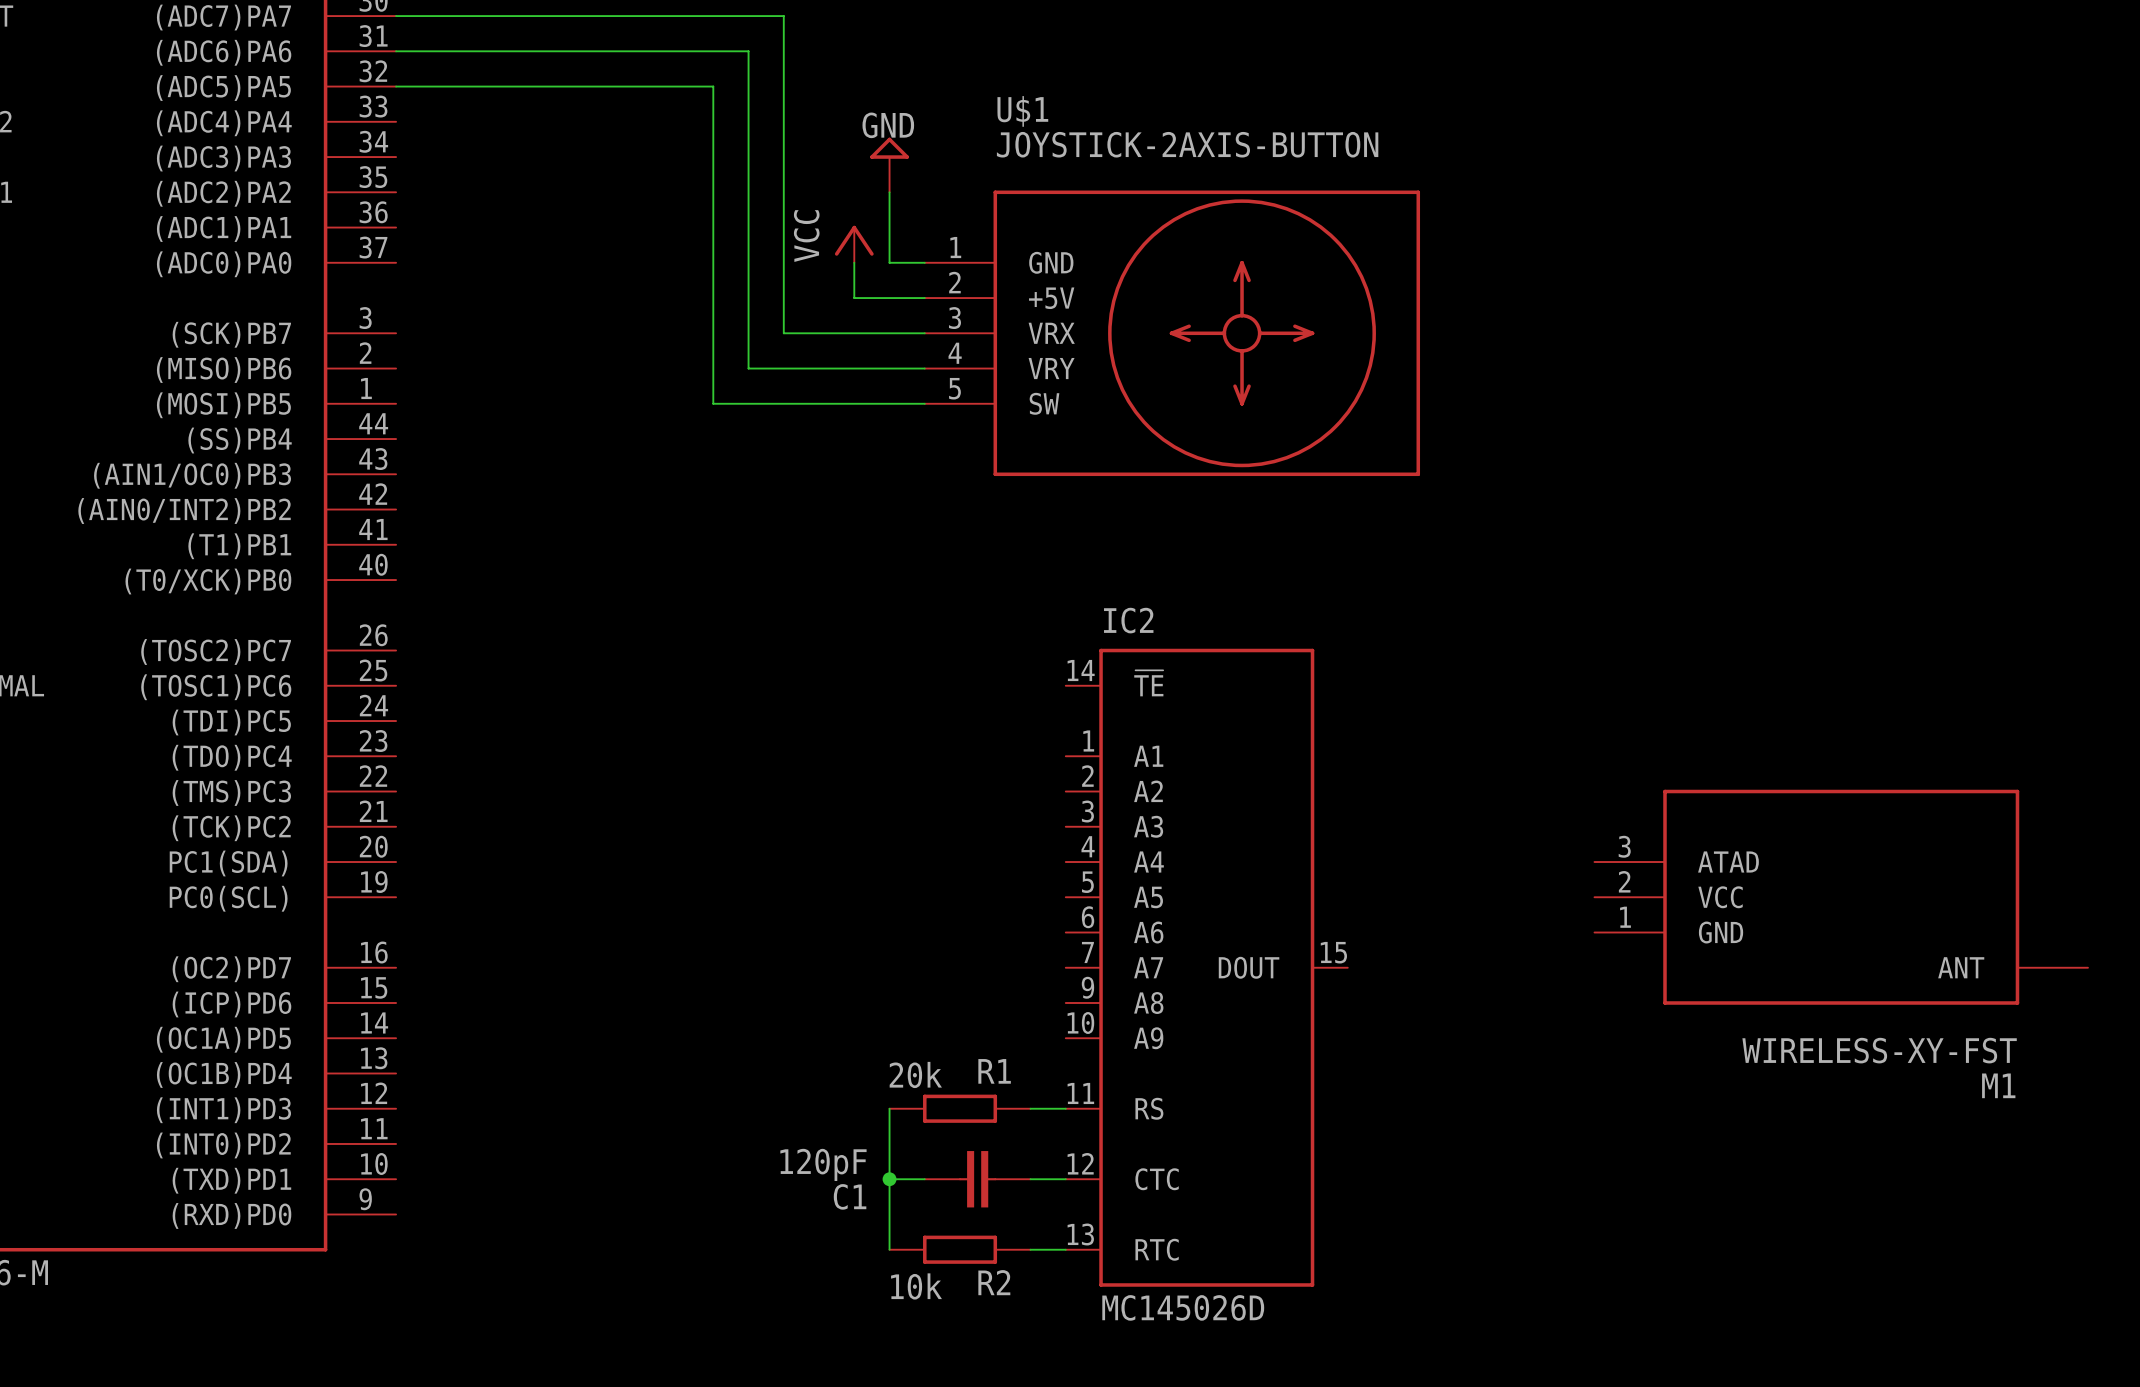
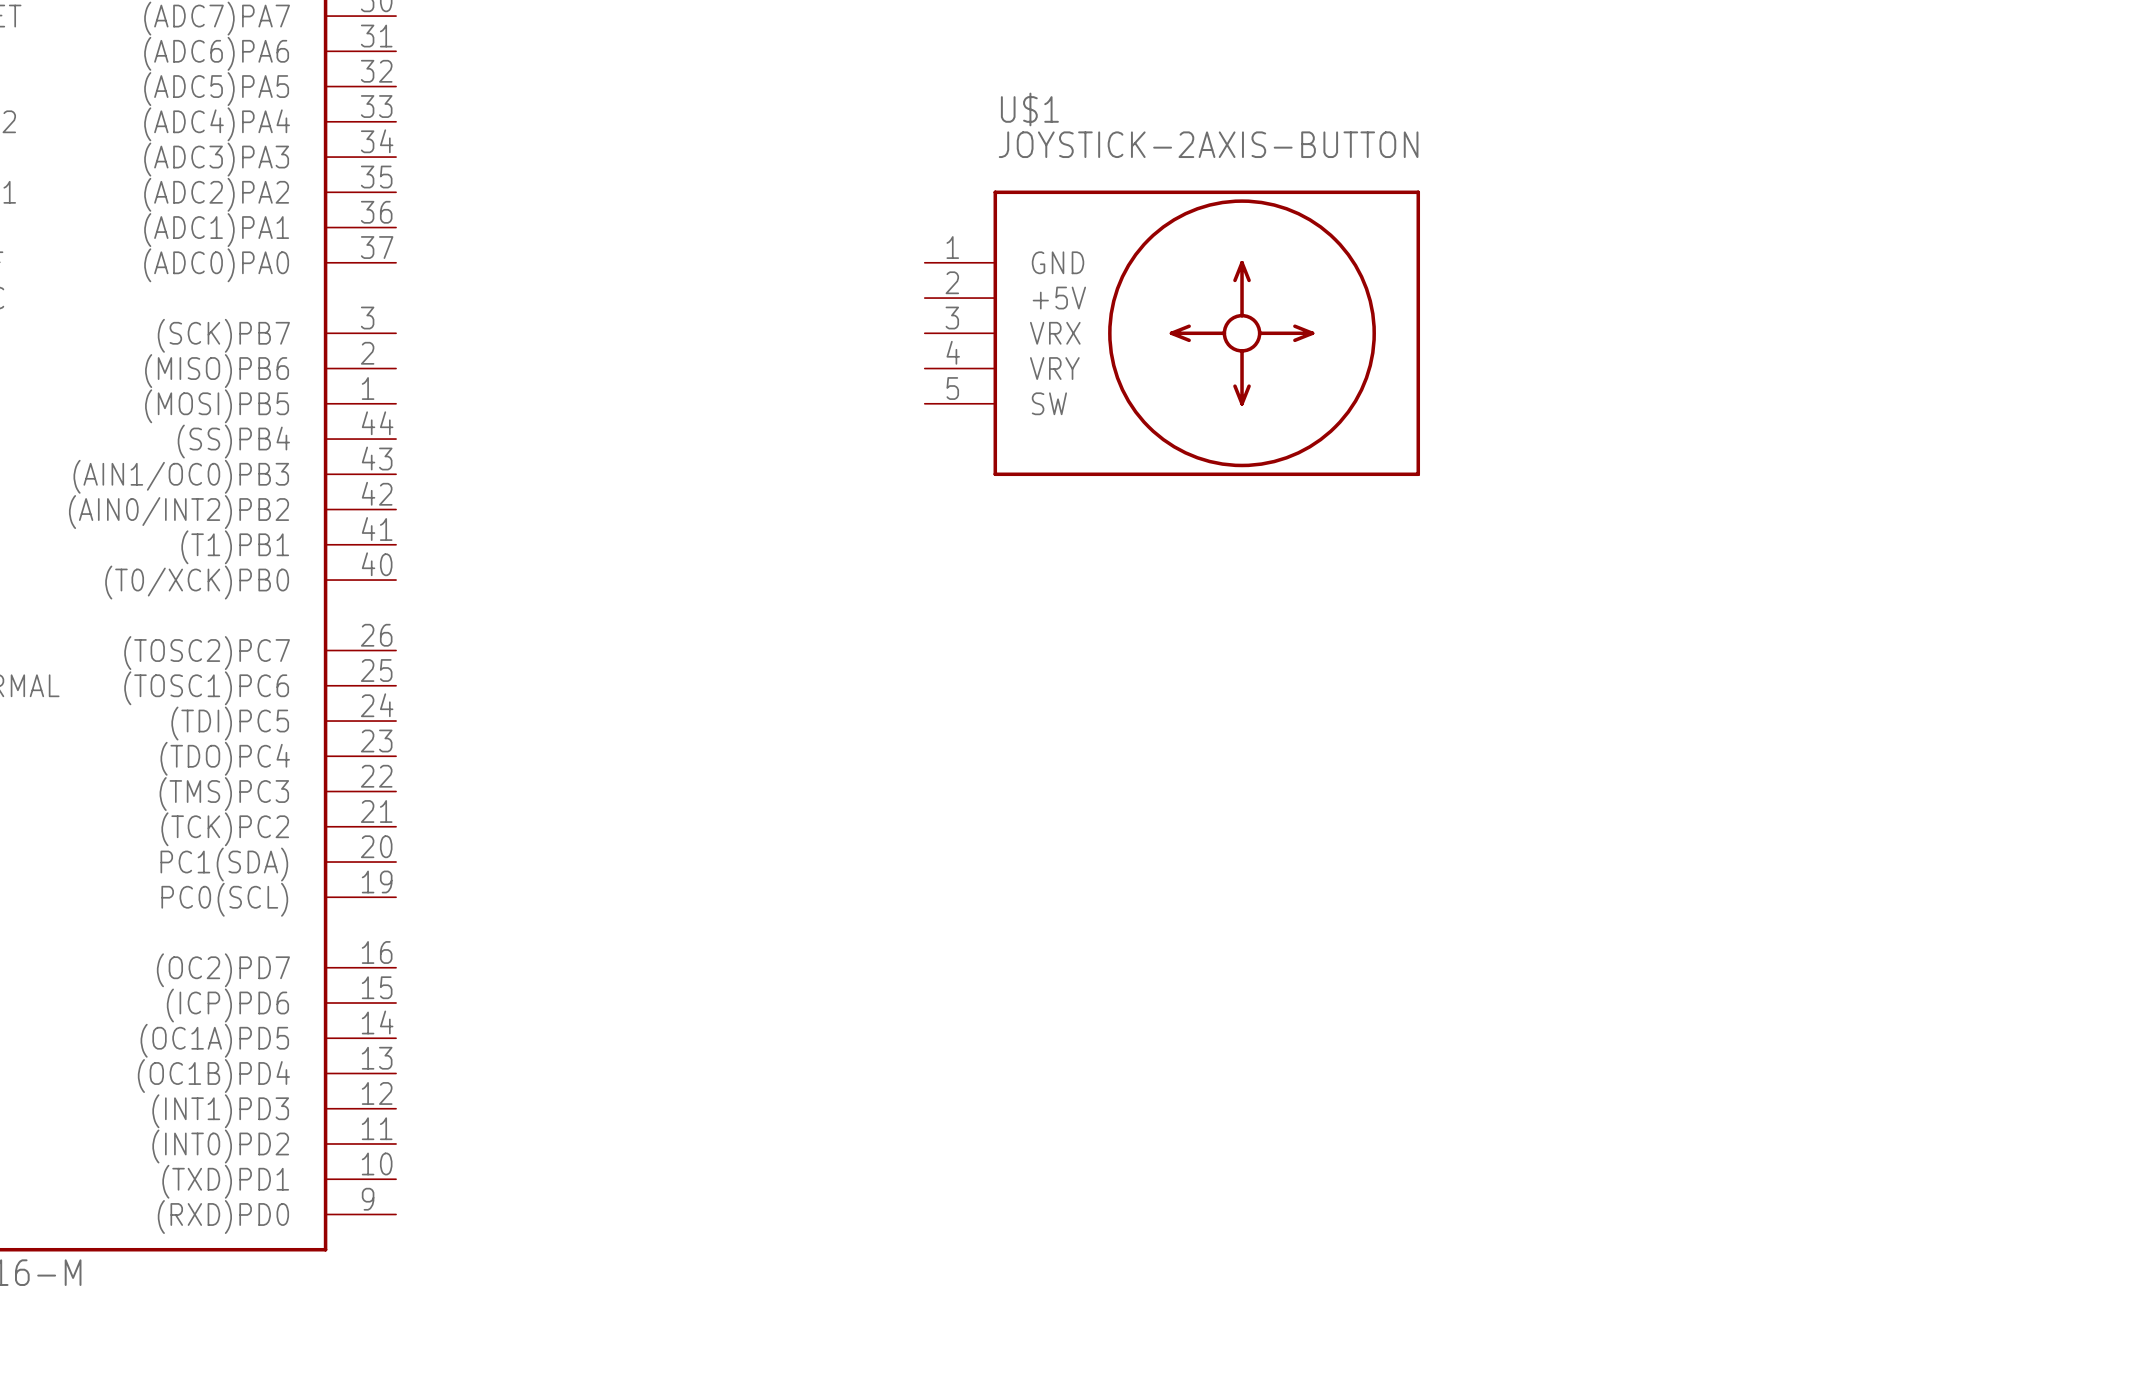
wire: (396, 16) (783, 16) (783, 333) (924, 333) -> none
wire: (396, 51) (748, 51) (748, 368) (924, 368) -> none
wire: (396, 86) (713, 86) (713, 403) (924, 403) -> none
power symbol: GND (889, 164) -> none
wire: (889, 192) (889, 262) (924, 262) -> none
power symbol: VCC (854, 244) -> none
wire: (854, 262) (854, 298) (924, 298) -> none
M1: WIRELESS-XY-FST (1841, 897) -> none
IC2: MC145026D (1206, 967) -> none
wire: (889, 1108) (889, 1249) -> none
R1: 20k (960, 1108) -> none
wire: (1030, 1108) (1065, 1108) -> none
wire: (889, 1179) (924, 1179) -> none
junction: (889, 1179) -> none
C1: 120pF (977, 1179) -> none
wire: (1030, 1179) (1065, 1179) -> none
R2: 10k (960, 1249) -> none
wire: (1030, 1249) (1065, 1249) -> none

